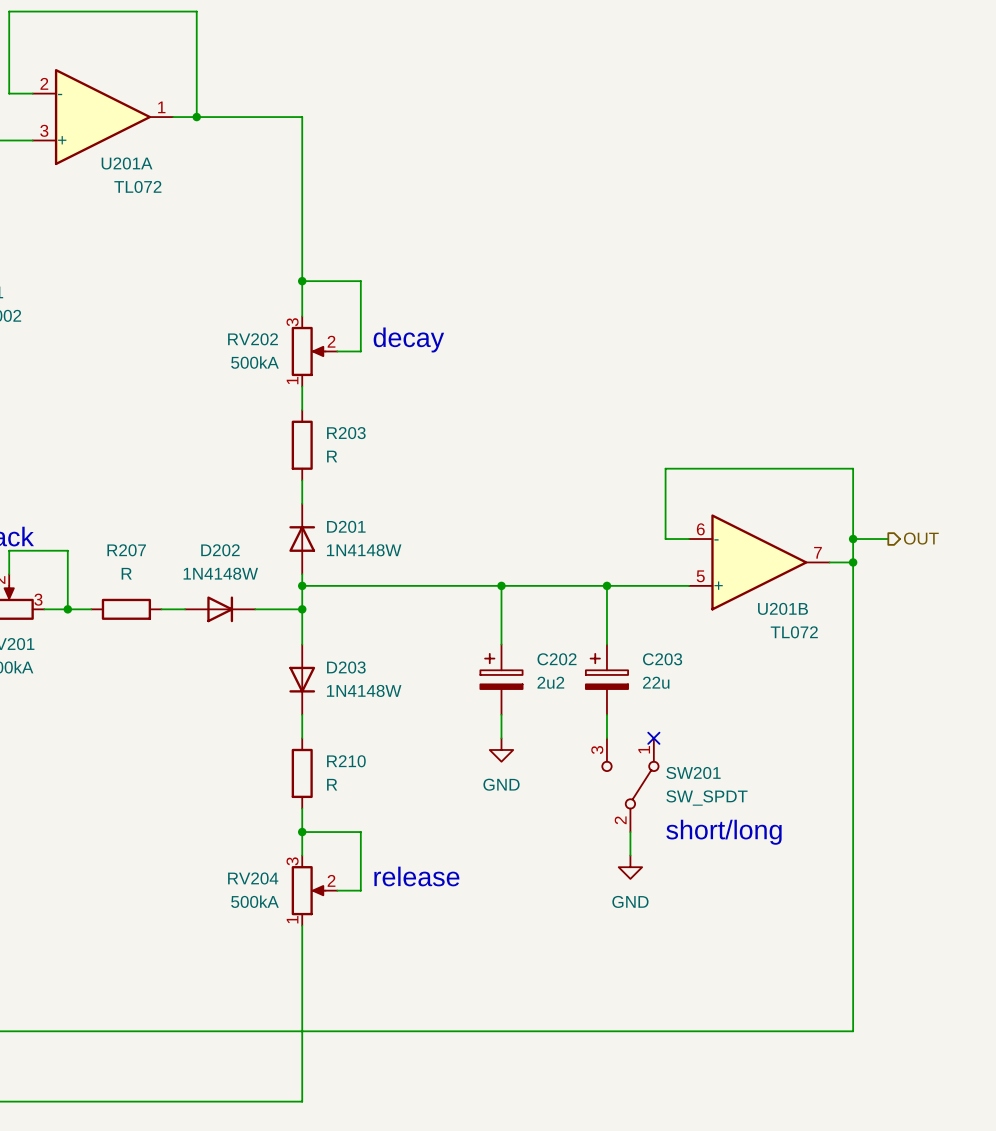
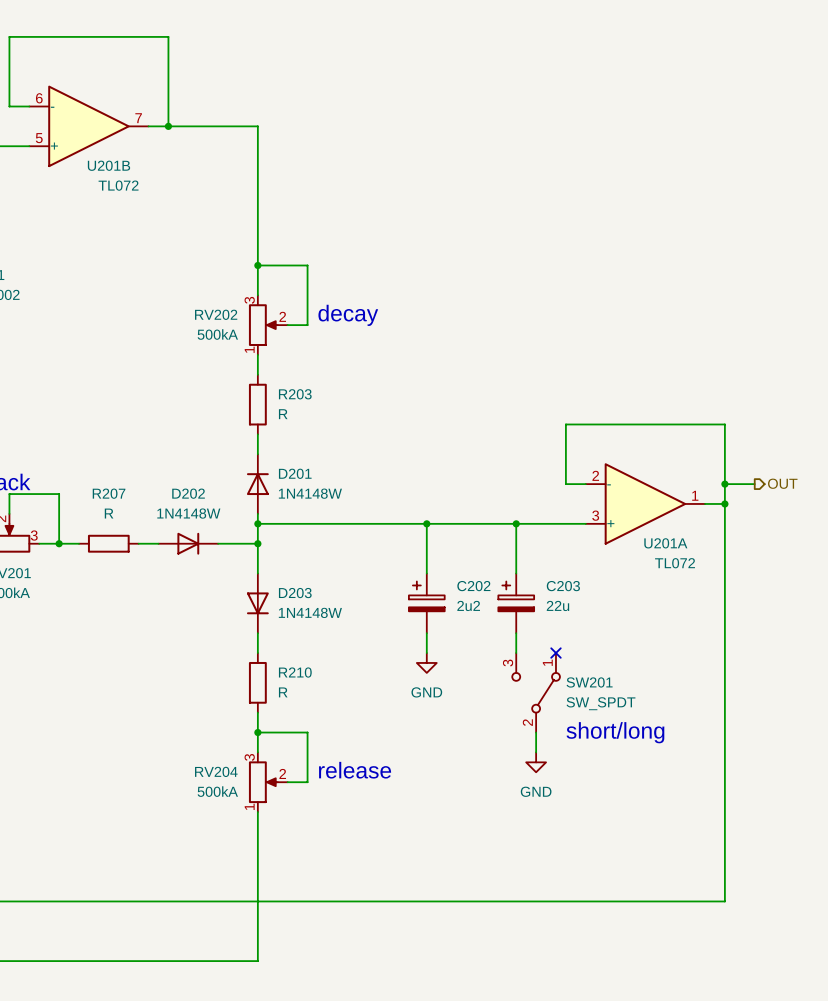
U201A position: (102, 117) -> (645, 503)
U201B position: (759, 562) -> (88, 126)

